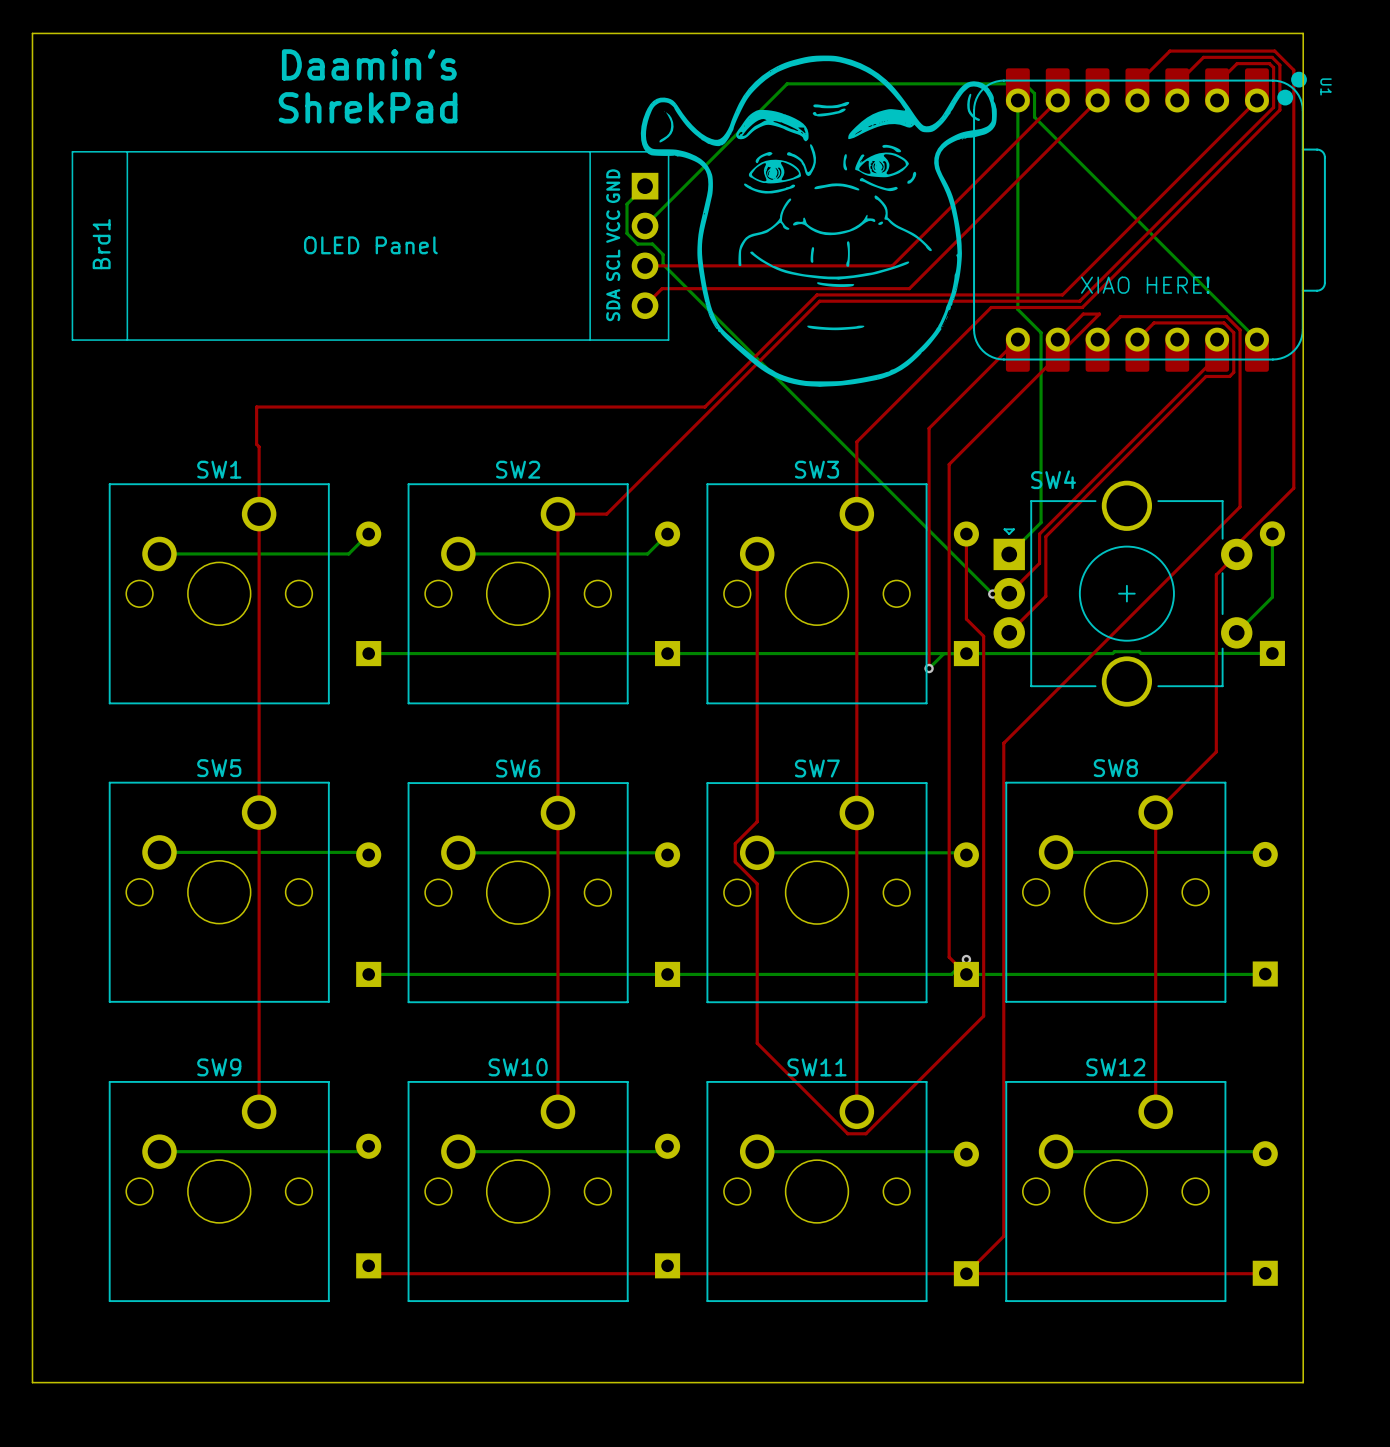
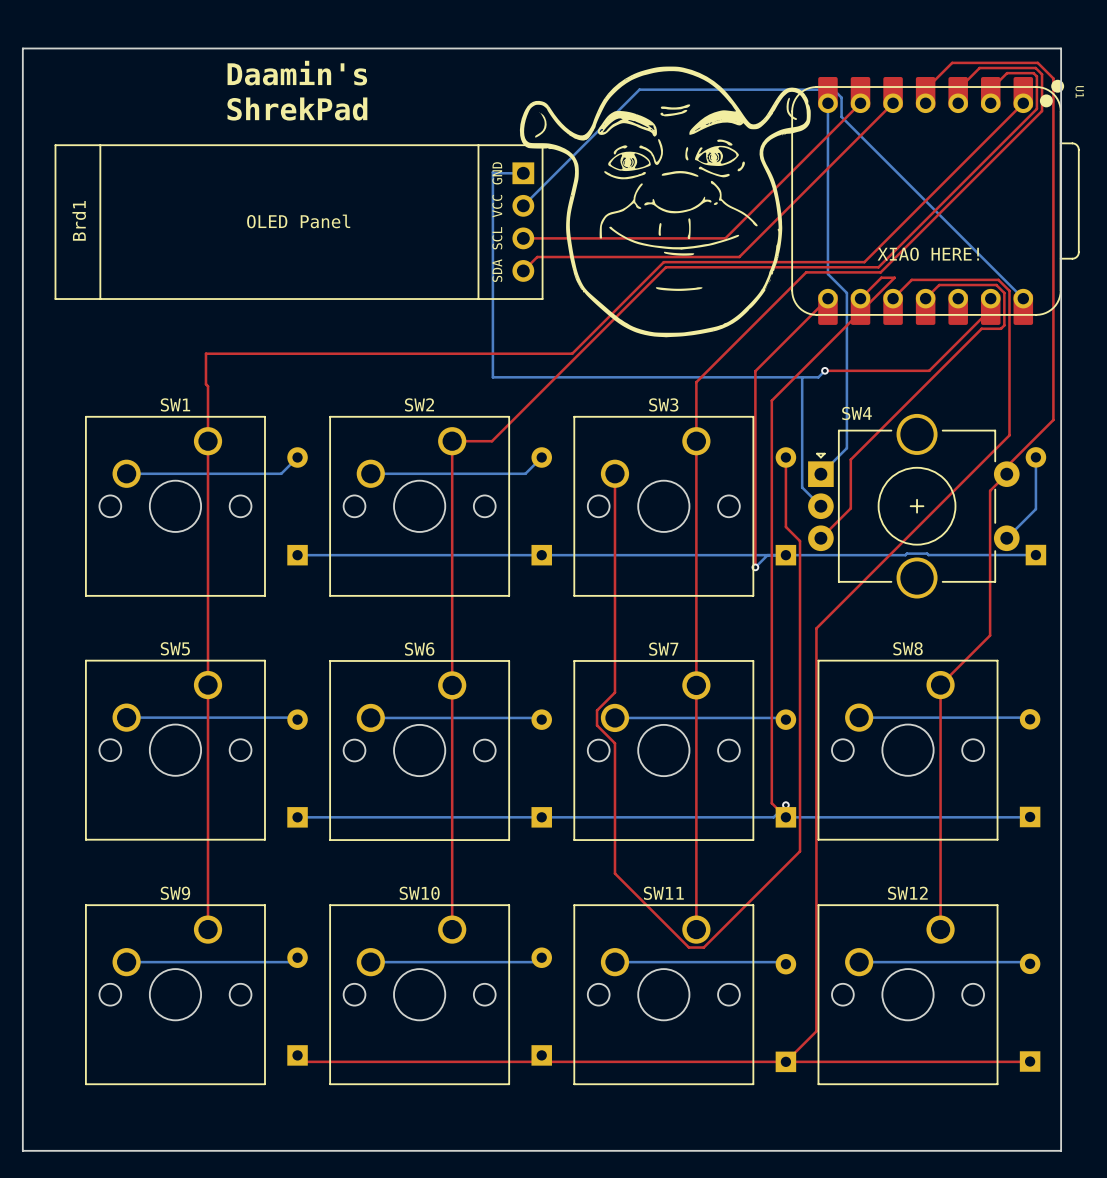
bottom track: (645, 186) (627, 204) (627, 233) (637, 244) (652, 244) (663, 254) (663, 264) (992, 594) -> (523, 173) (492, 172) (492, 377) (818, 377) (824, 370)
top track: none -> (990, 309) (929, 370) (824, 370)
top track: (1217, 356) (1039, 534) (1039, 563) (1009, 593) (992, 594) -> none
via: none -> (824, 370)
bottom track: none -> (802, 377) (802, 487) (820, 506)
via: (992, 594) -> none

